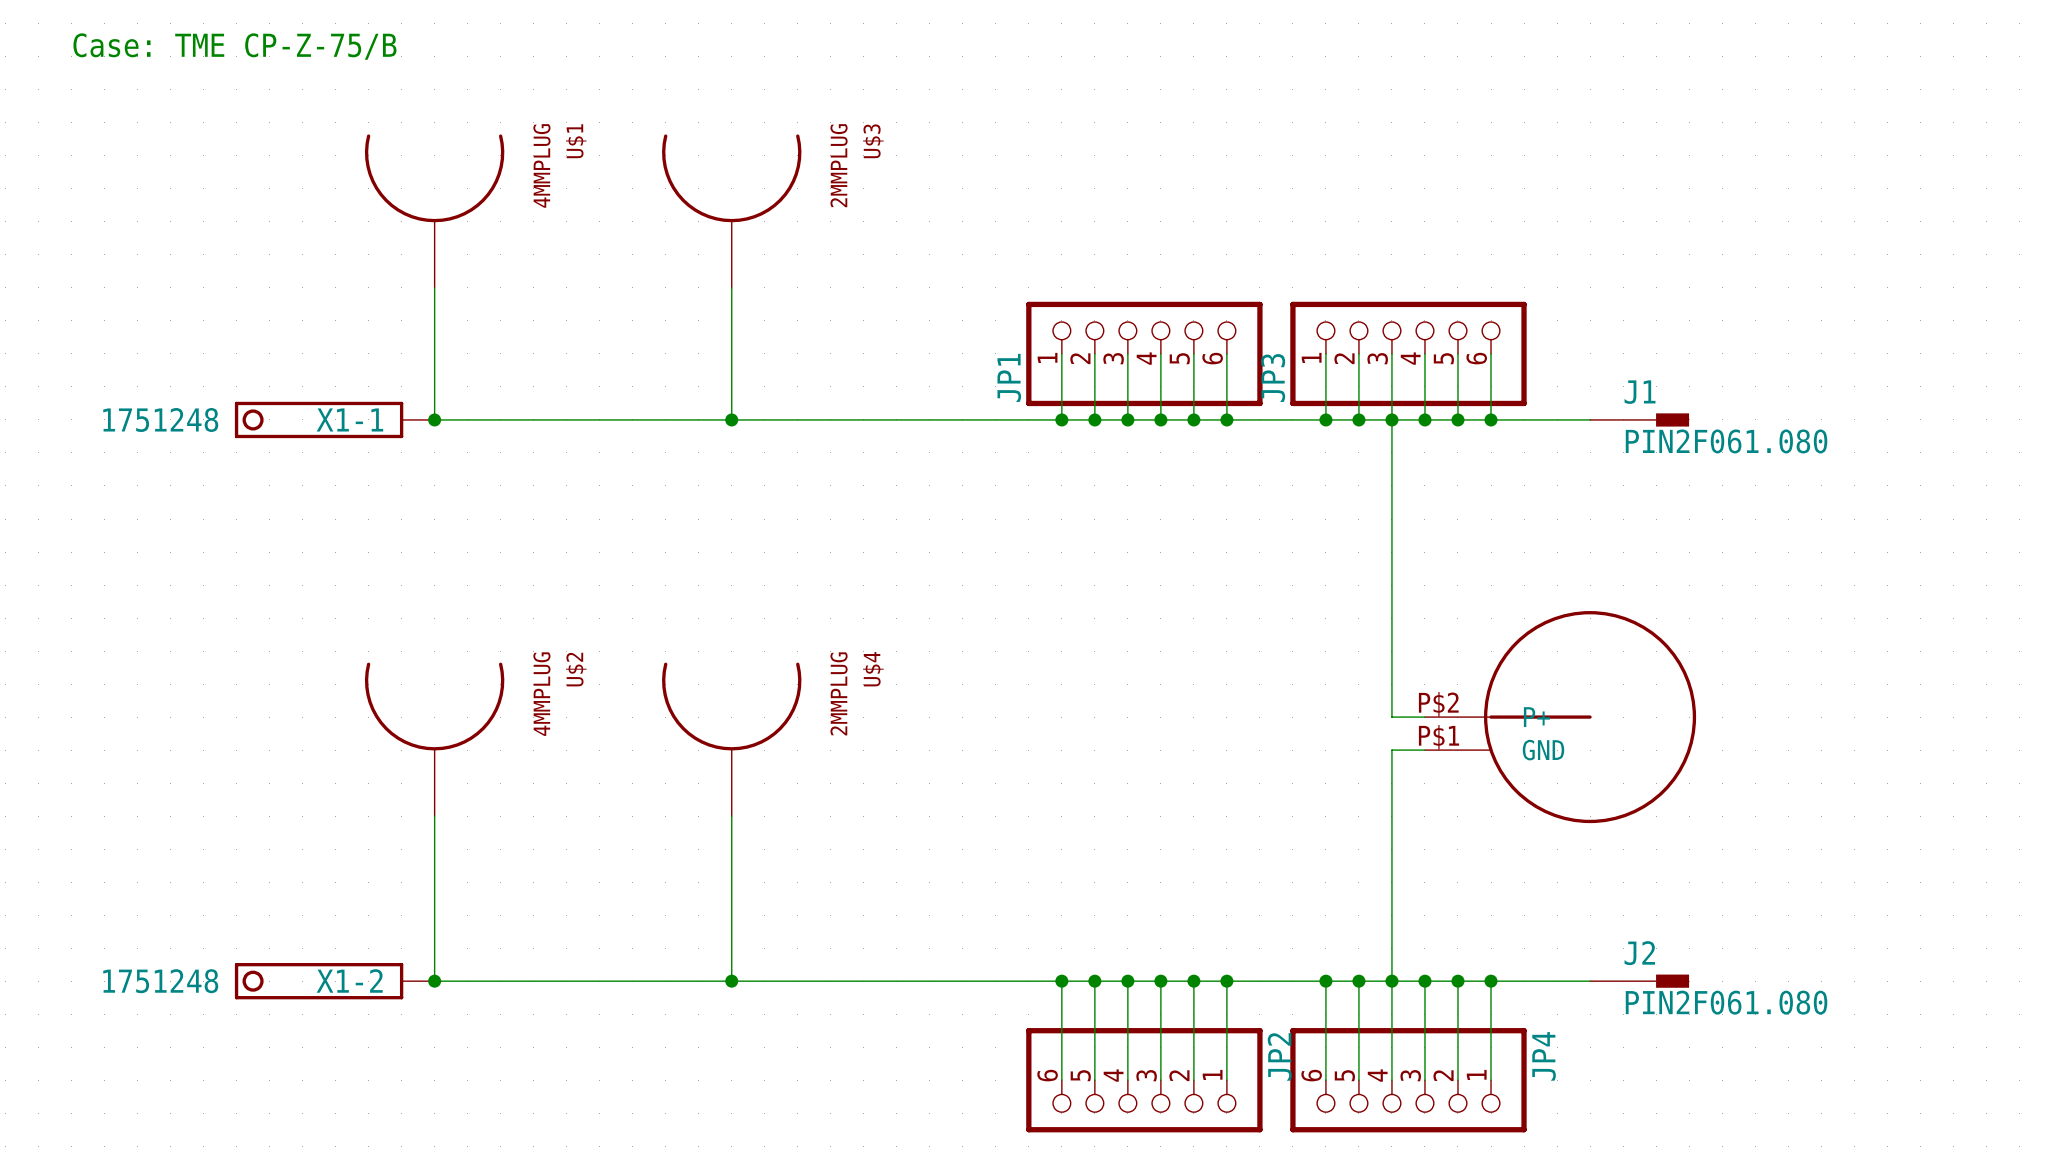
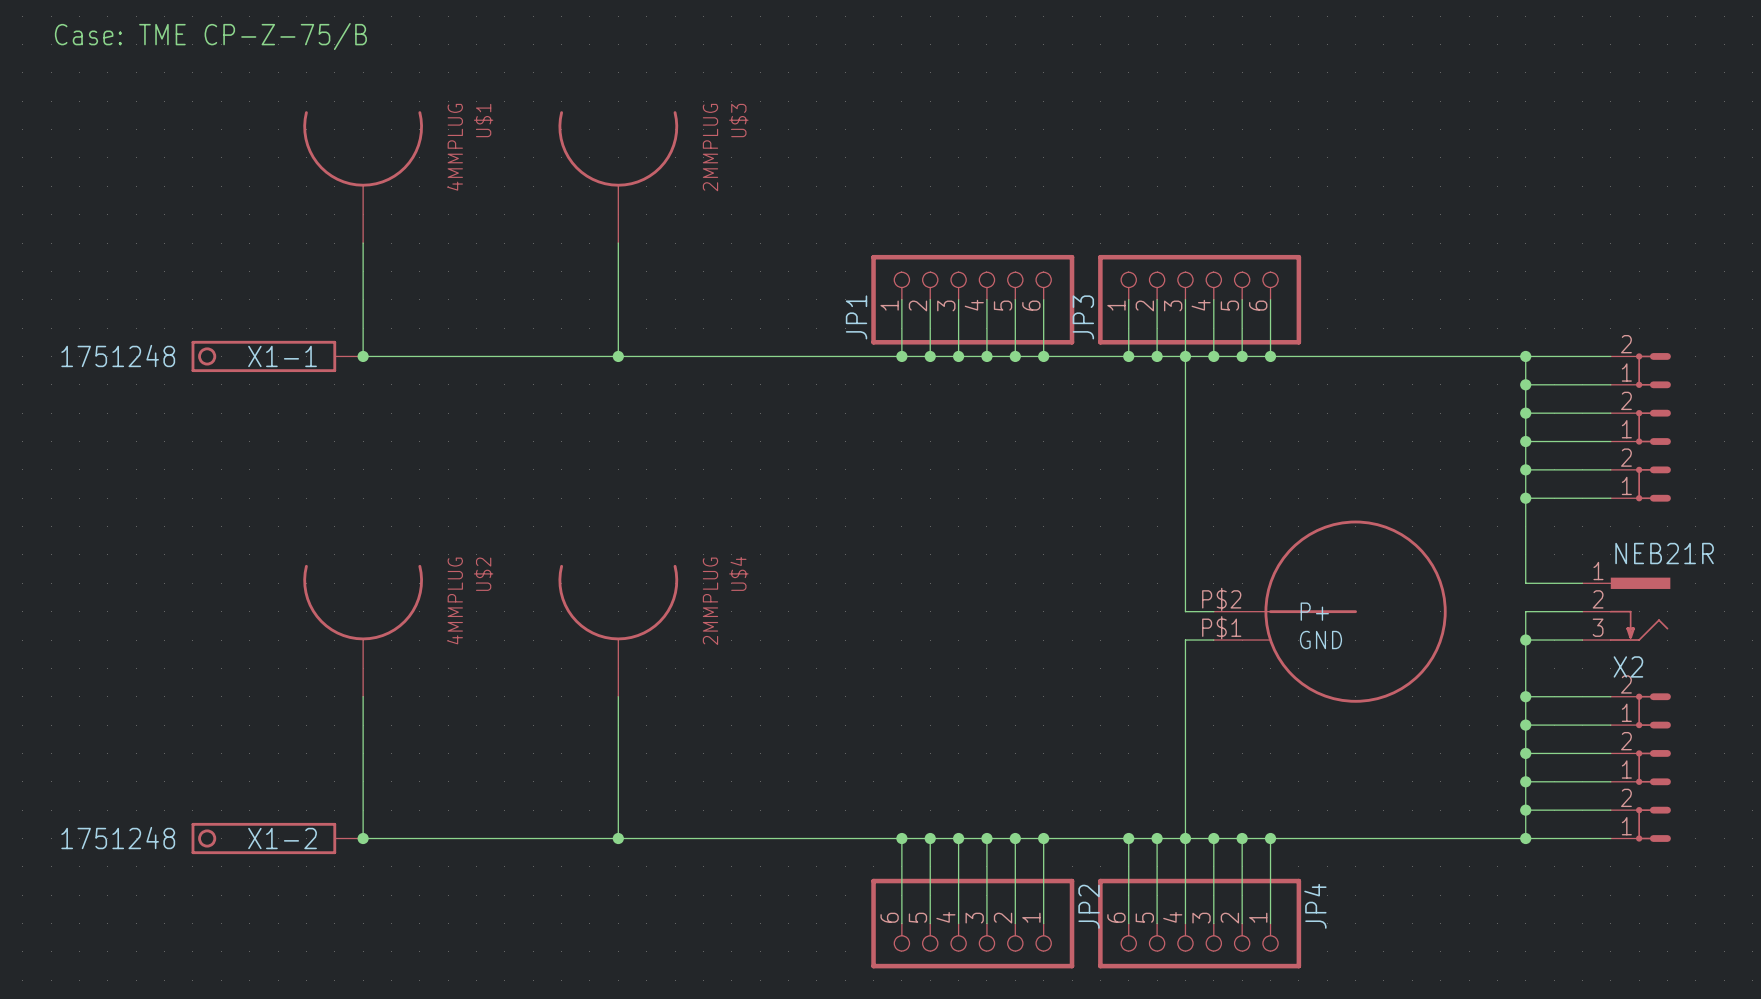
wire: none -> (1355, 356) (1610, 356)
J1: PIN2F061.080 (1639, 419) -> none
wire: none -> (1525, 356) (1525, 583) (1582, 583)
junction: none -> (1525, 356)
part: none -> (1640, 370)
wire: none -> (1525, 384) (1610, 384)
junction: none -> (1525, 384)
wire: none -> (1525, 413) (1610, 413)
junction: none -> (1525, 413)
part: none -> (1640, 427)
wire: none -> (1525, 441) (1610, 441)
junction: none -> (1525, 441)
wire: none -> (1525, 469) (1610, 469)
junction: none -> (1525, 469)
part: none -> (1640, 484)
wire: none -> (1525, 498) (1610, 498)
junction: none -> (1525, 498)
X2: none -> NEB21R (1626, 609)
wire: none -> (1582, 611) (1525, 611) (1525, 838)
wire: none -> (1525, 640) (1582, 640)
junction: none -> (1525, 640)
wire: none -> (1525, 696) (1610, 696)
junction: none -> (1525, 696)
part: none -> (1640, 710)
wire: none -> (1525, 725) (1610, 725)
junction: none -> (1525, 725)
wire: none -> (1525, 753) (1610, 753)
junction: none -> (1525, 753)
part: none -> (1640, 767)
wire: none -> (1525, 781) (1610, 781)
junction: none -> (1525, 781)
wire: none -> (1525, 810) (1610, 810)
junction: none -> (1525, 810)
part: none -> (1640, 824)
wire: none -> (1355, 838) (1610, 838)
J2: PIN2F061.080 (1639, 981) -> none
junction: none -> (1525, 838)

